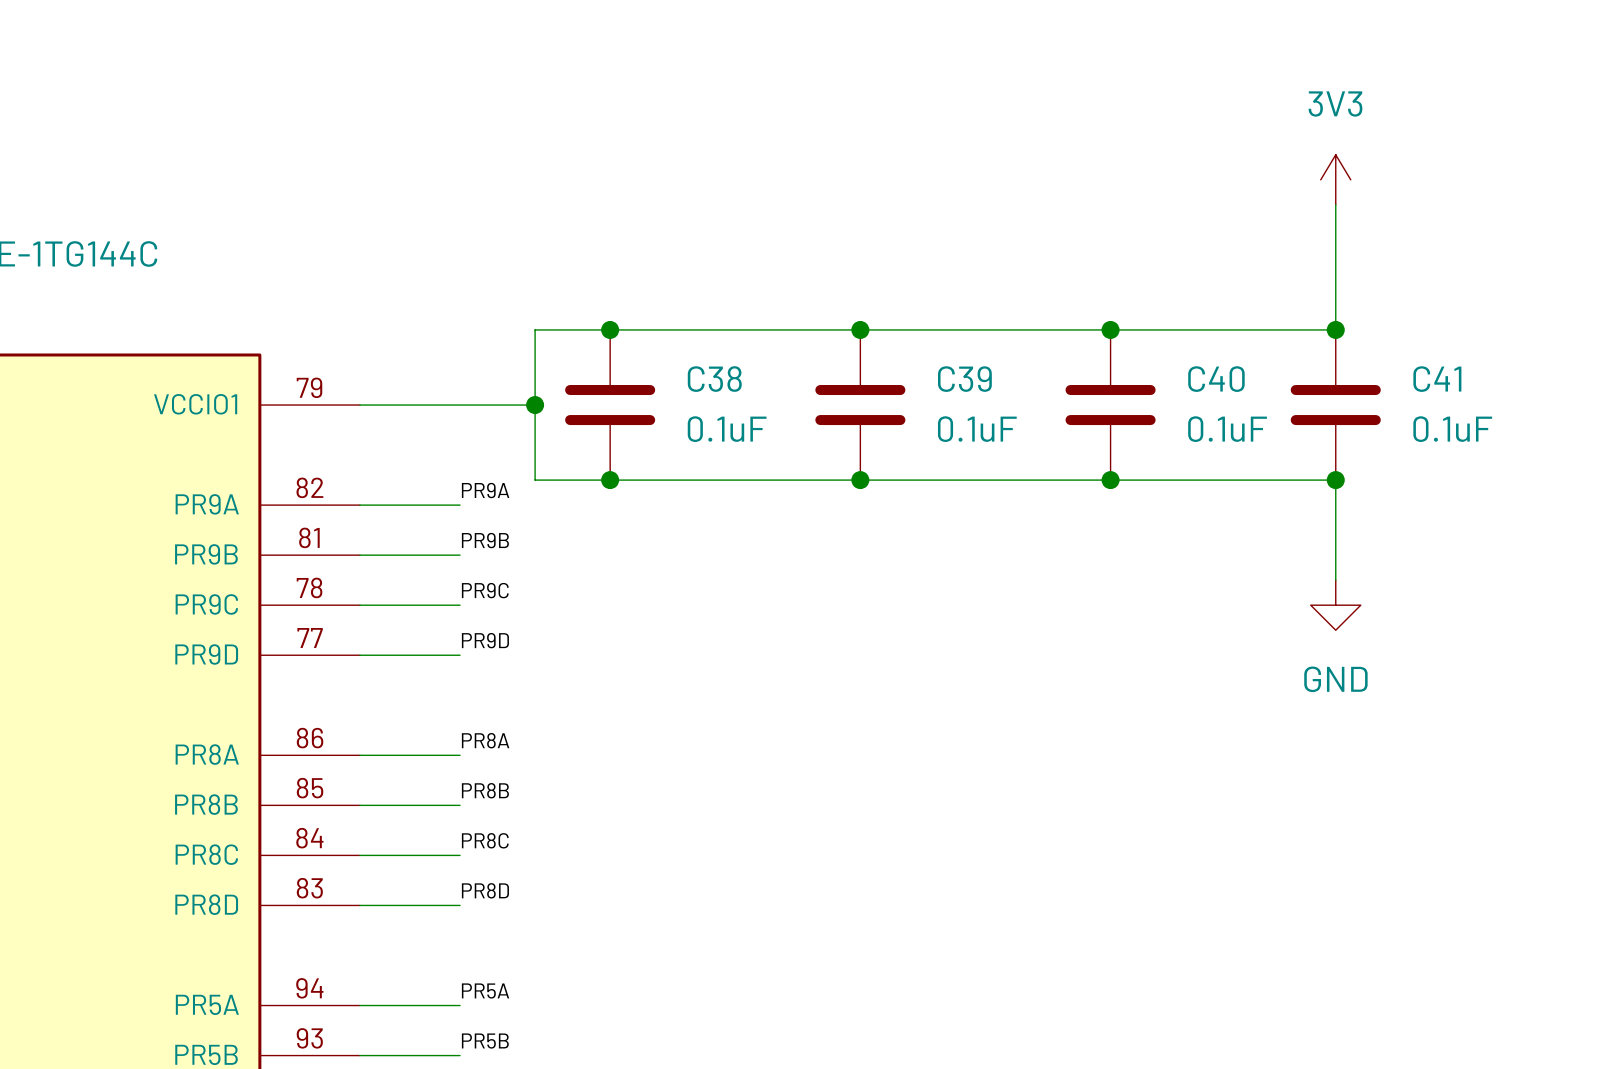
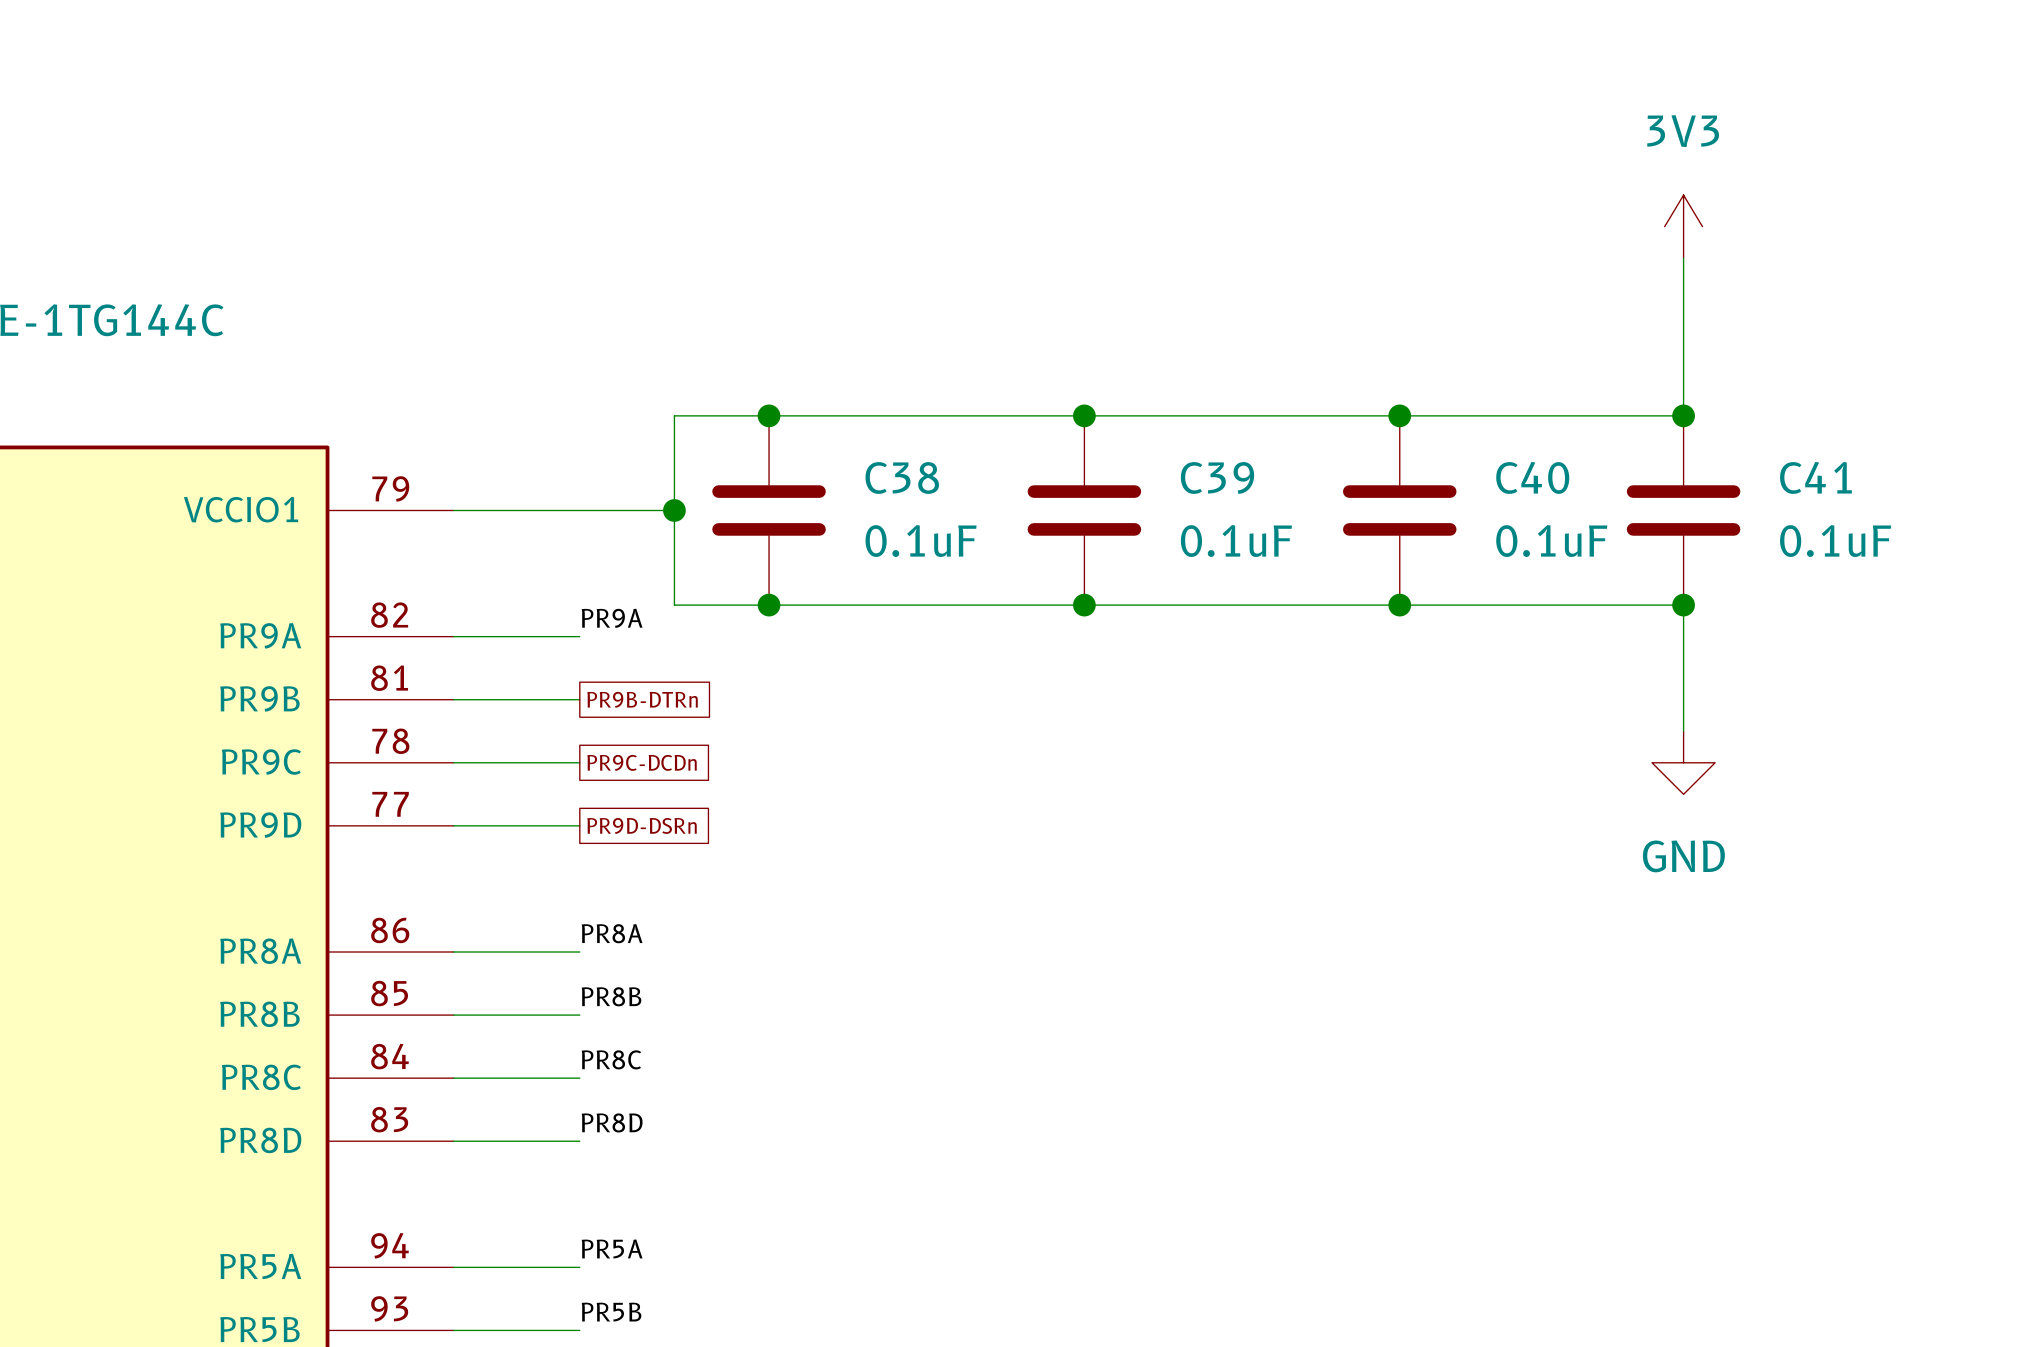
label: PR9B (485, 540) -> none
global label: none -> PR9B-DTRn (642, 699)
label: PR9C (485, 590) -> none
global label: none -> PR9C-DCDn (642, 762)
label: PR9D (485, 640) -> none
global label: none -> PR9D-DSRn (642, 825)

